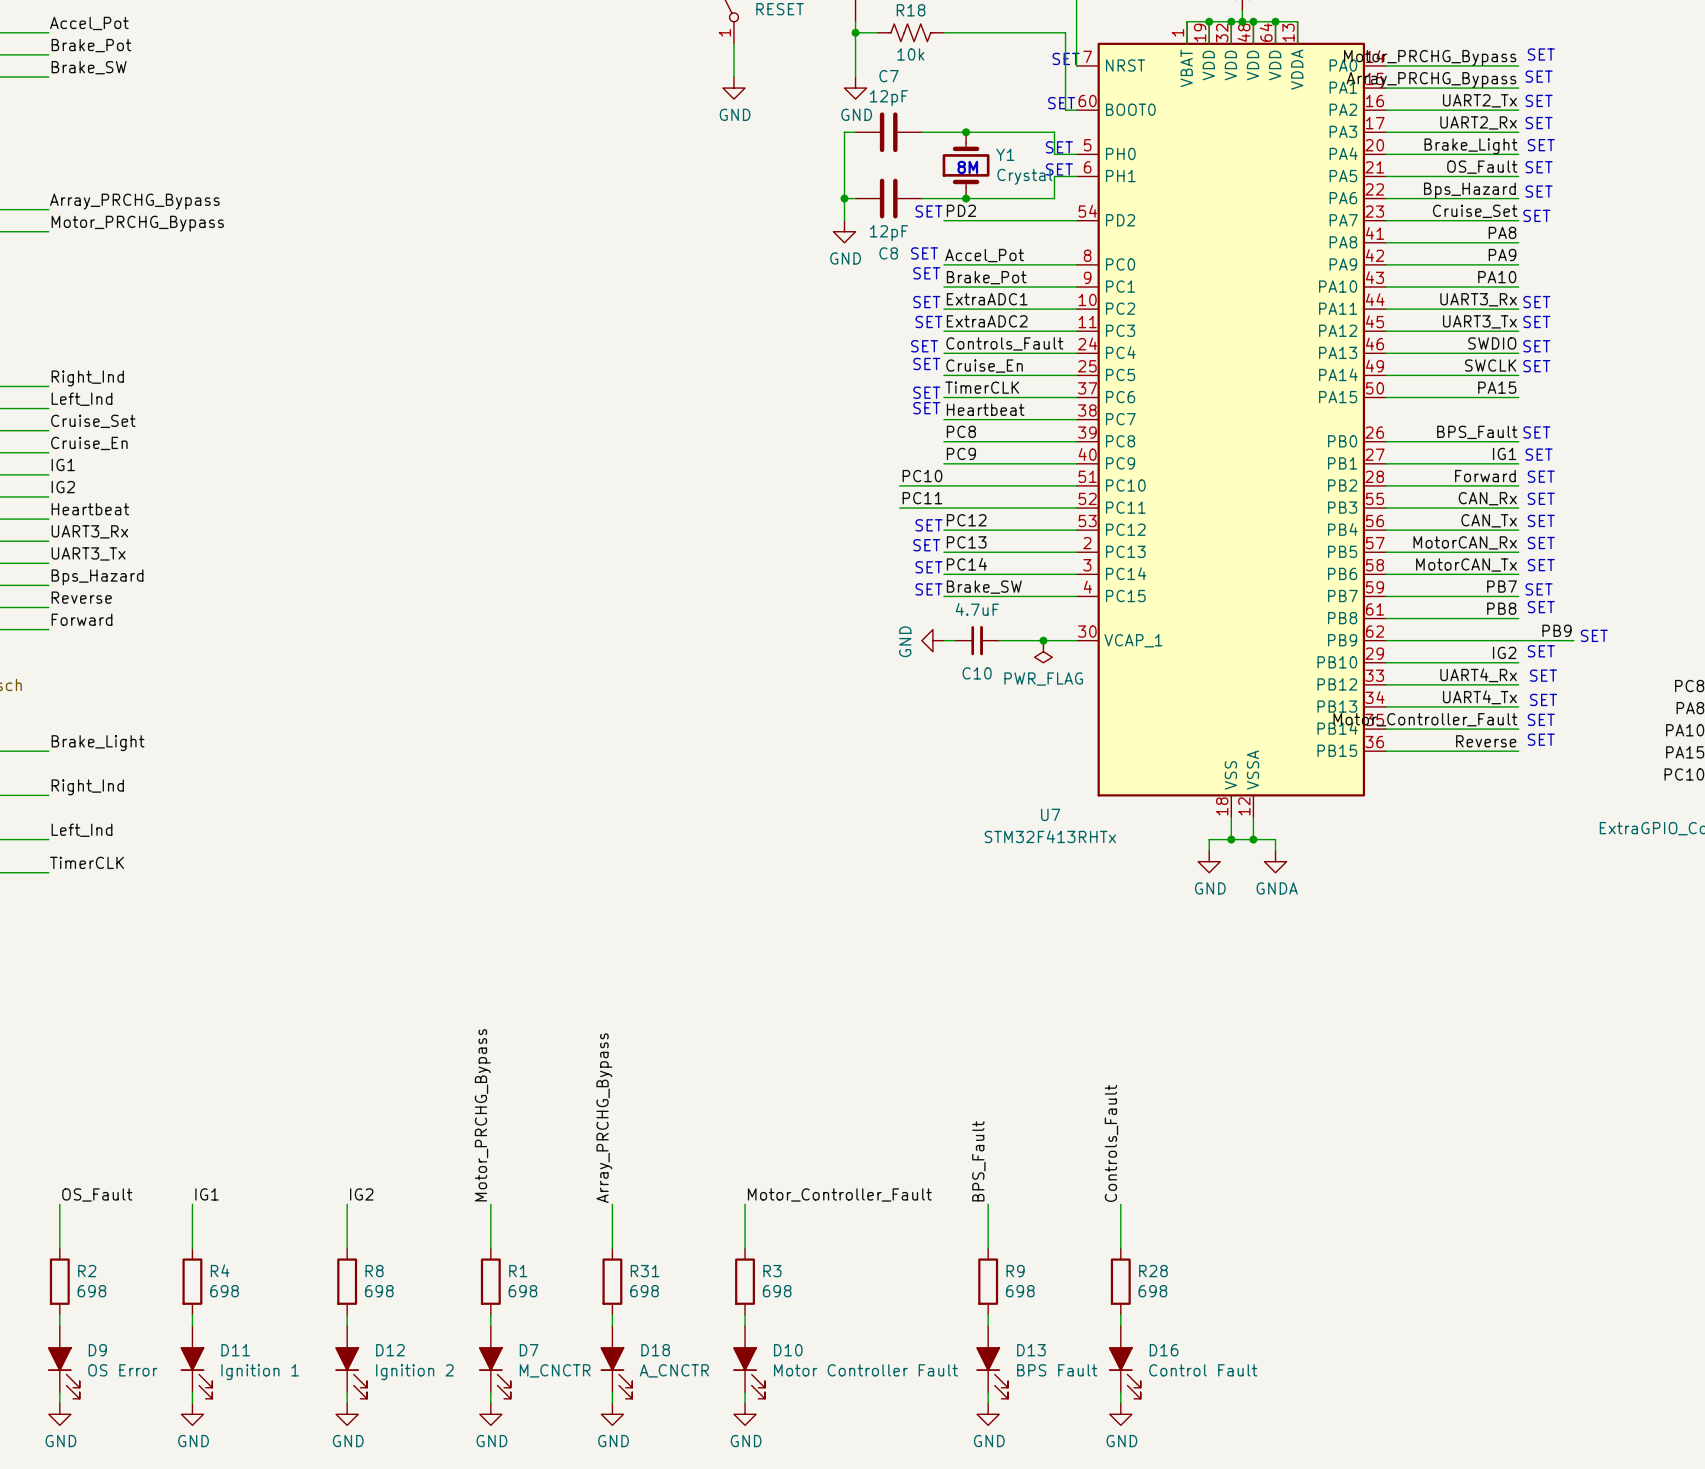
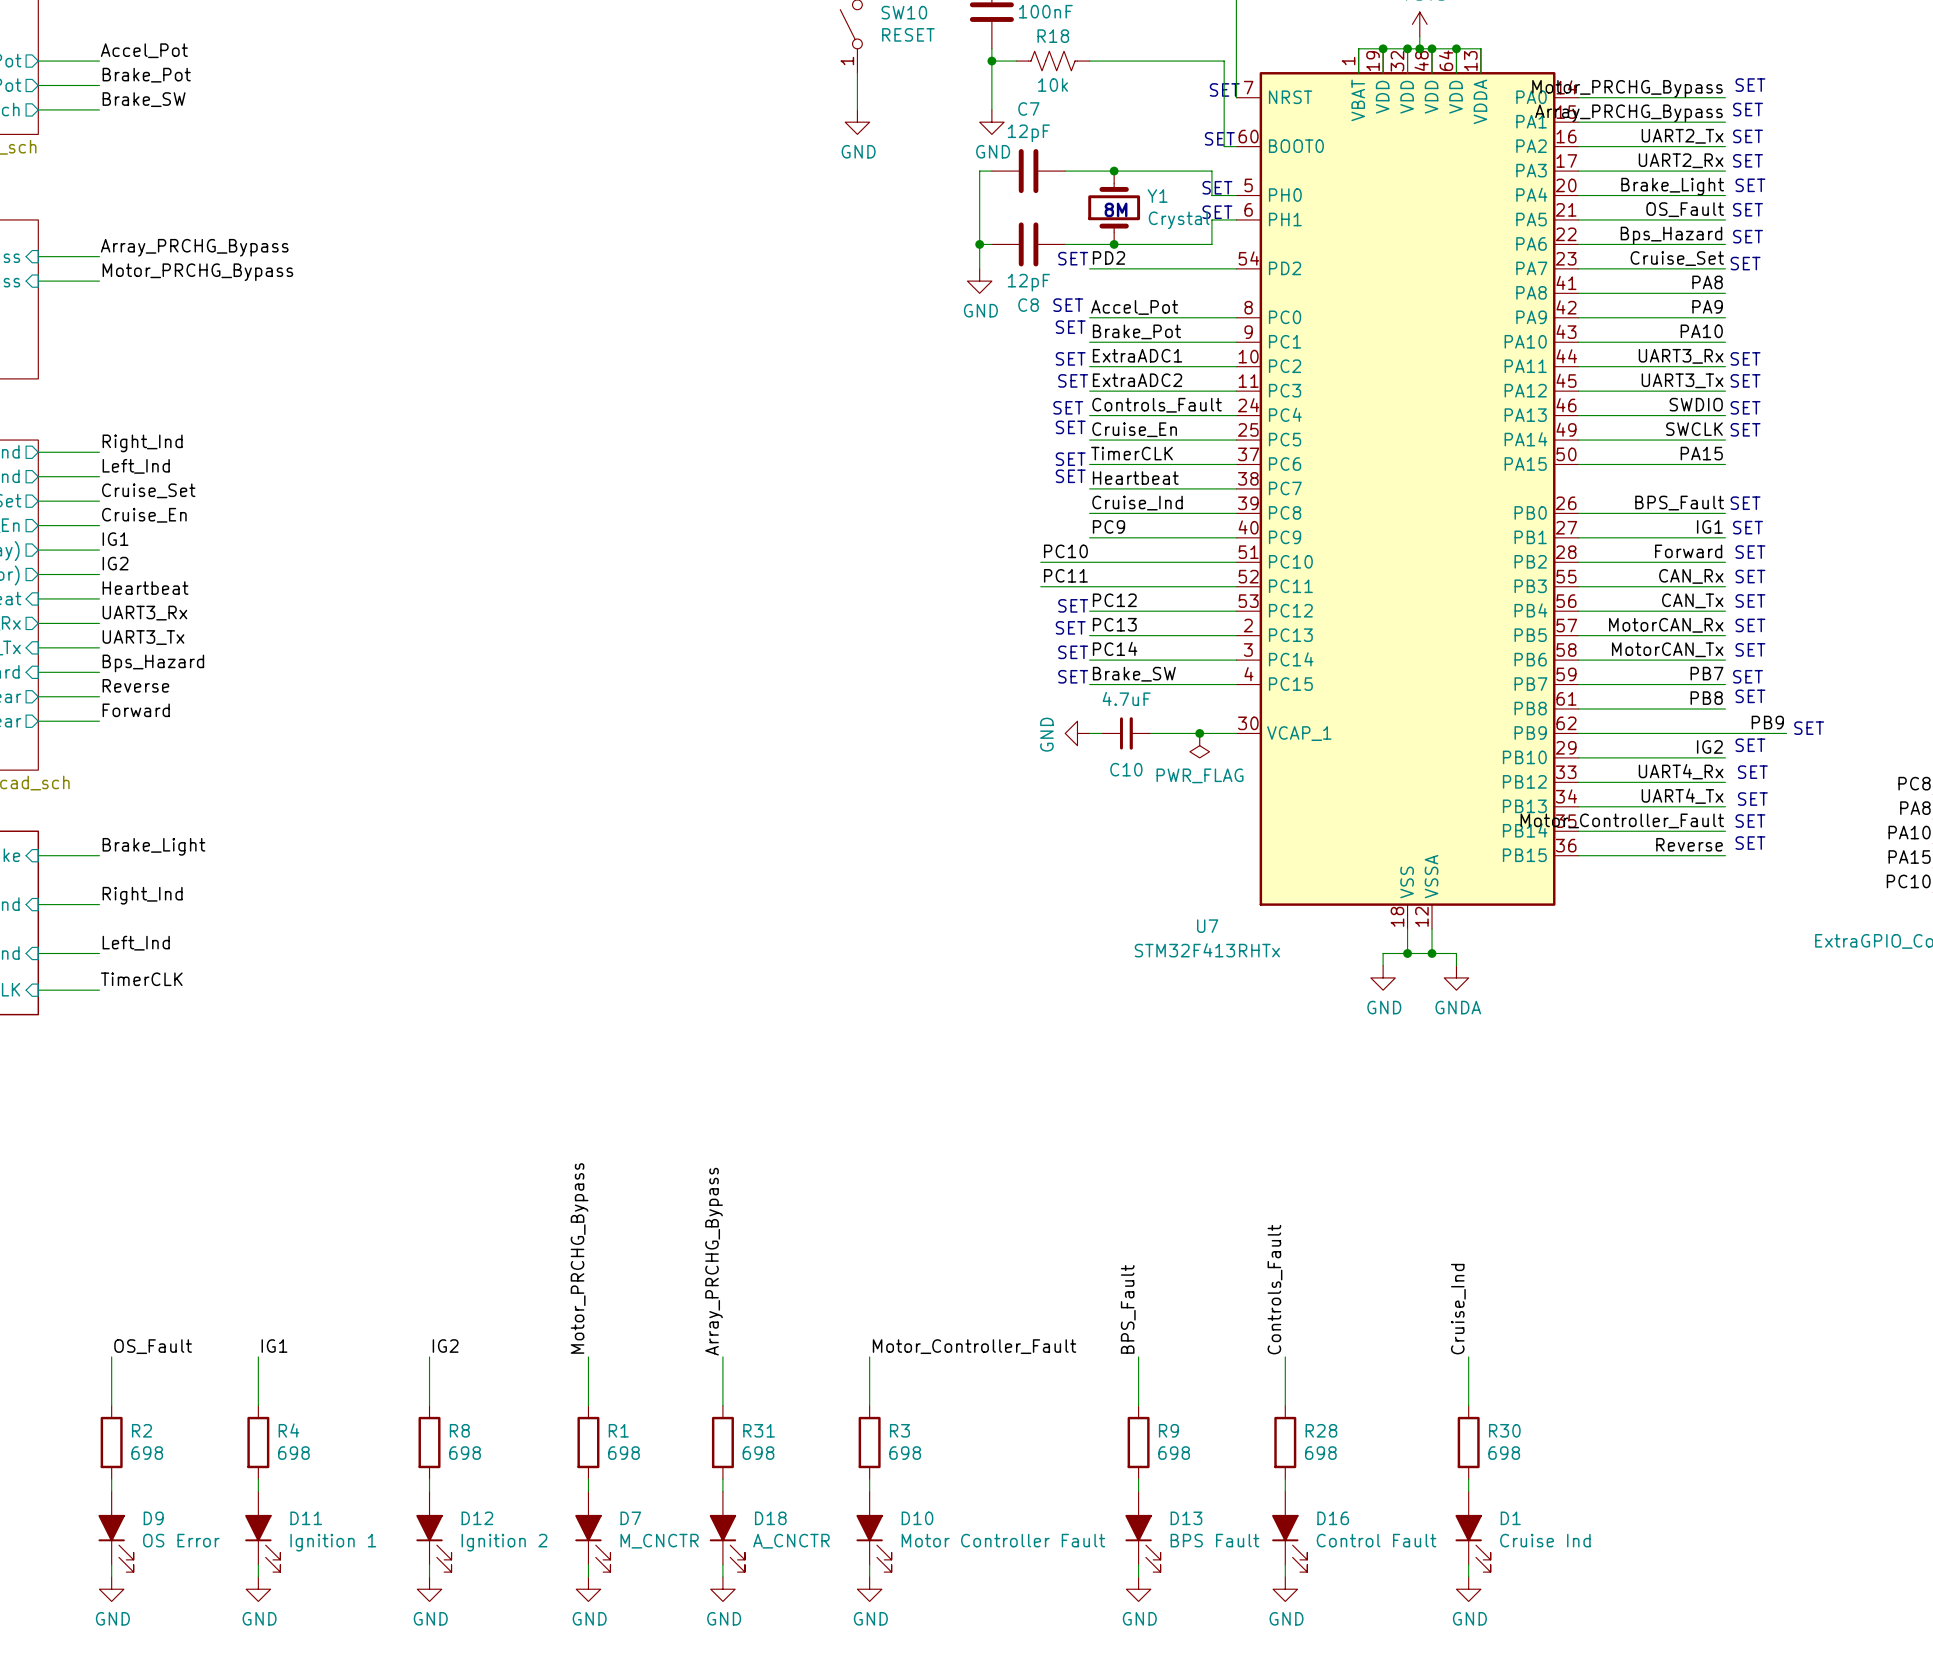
label: PC8 (961, 431) -> Cruise_Ind (1137, 503)
label: none -> Cruise_Ind (1458, 1309)
wire: none -> (1468, 1356) (1468, 1405)
R30: none -> 698 (1468, 1442)
wire: none -> (1468, 1479) (1468, 1491)
D1: none -> Cruise Ind (1473, 1531)
wire: none -> (1468, 1564) (1468, 1576)
power symbol: none -> GND (1468, 1589)

